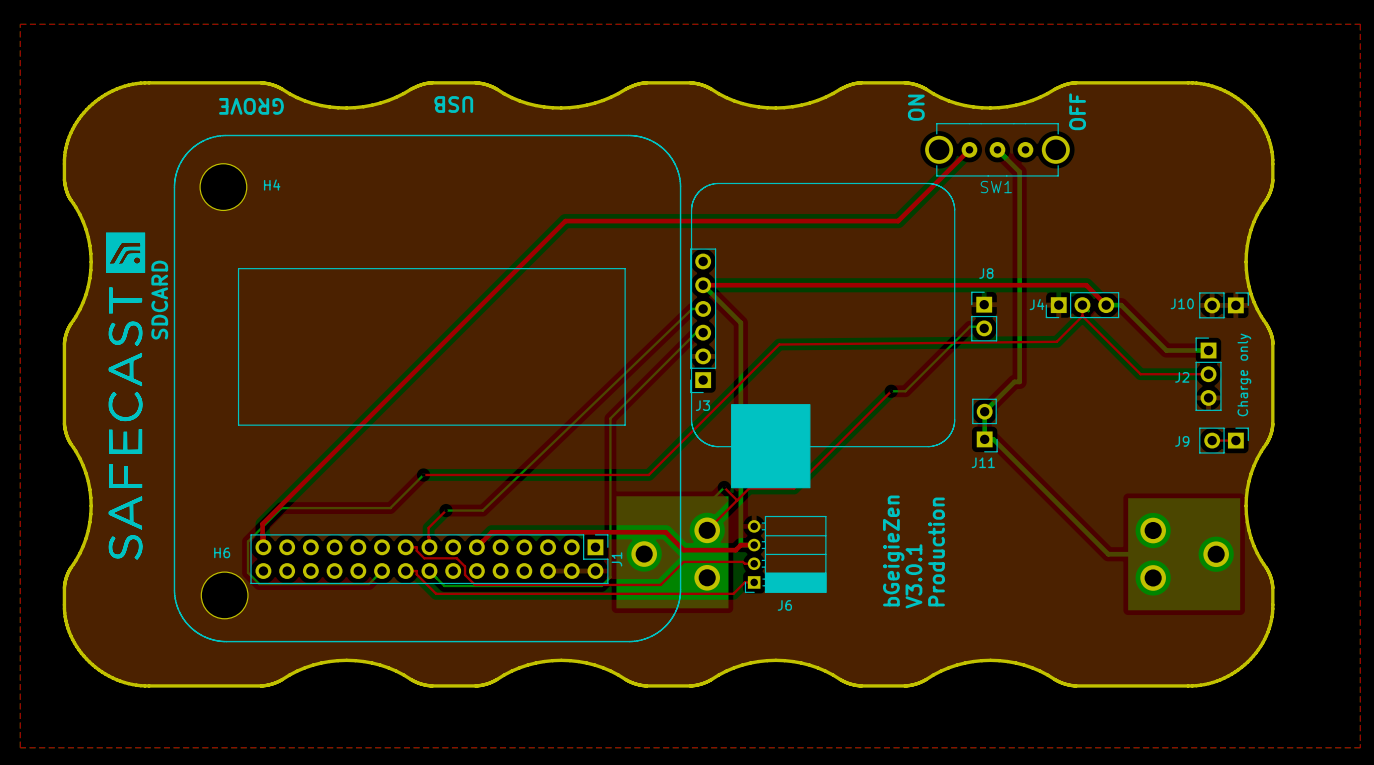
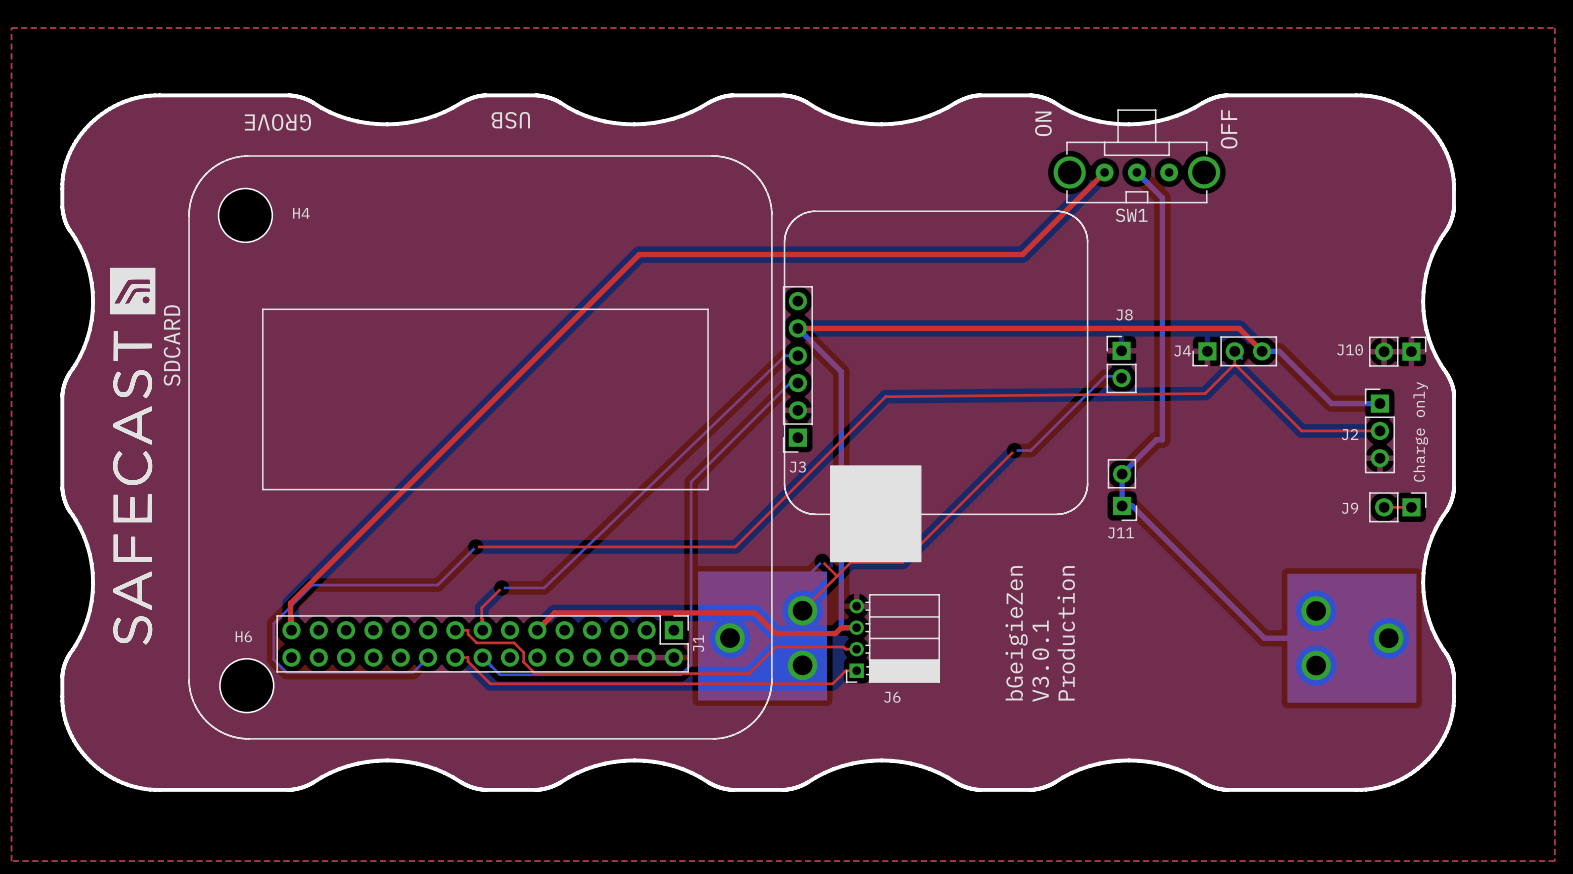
SW1 footprint: [925, 123, 1070, 177] -> [1053, 109, 1221, 204]

